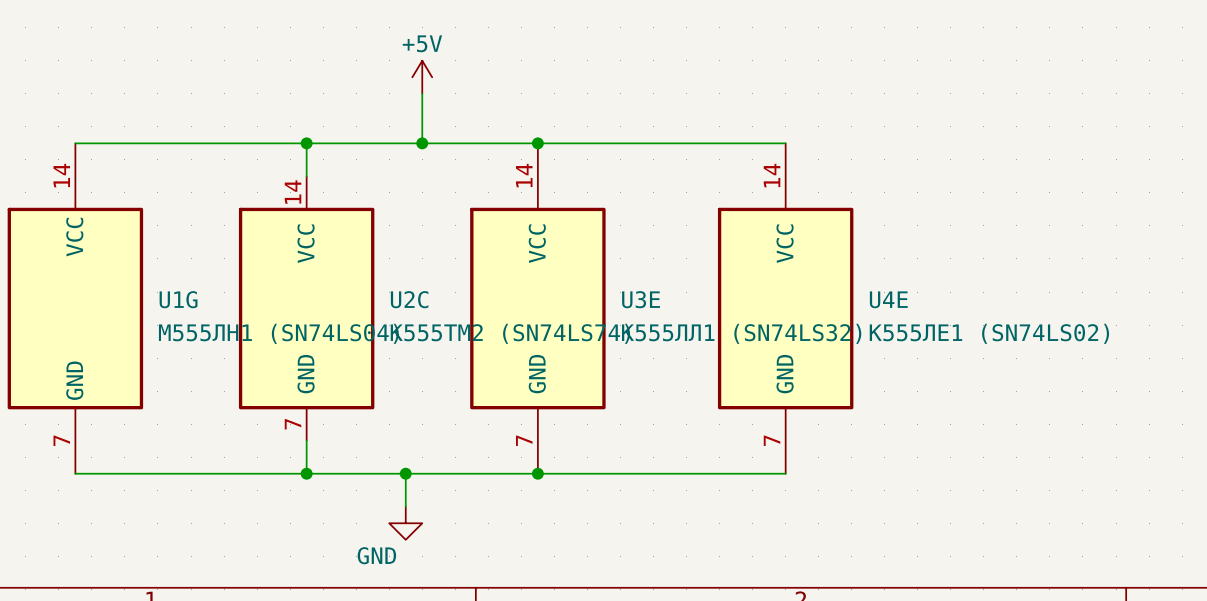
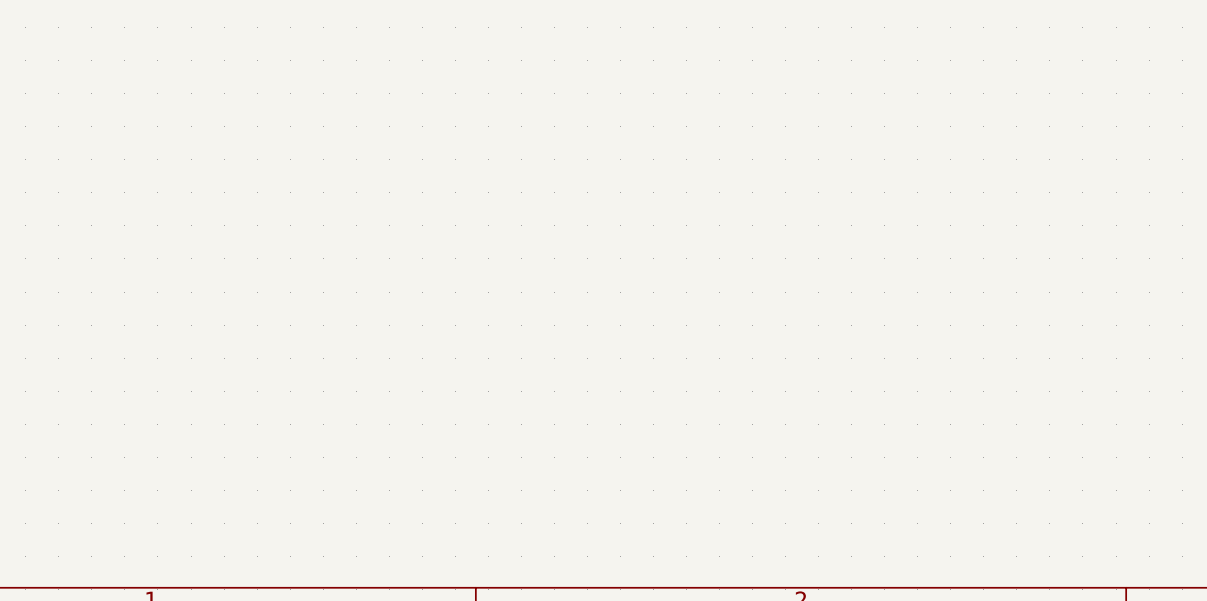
power symbol: +5V (422, 77) -> none
wire: (422, 93) (422, 143) -> none
wire: (75, 143) (785, 143) -> none
wire: (306, 143) (306, 176) -> none
junction: (306, 143) -> none
junction: (422, 143) -> none
junction: (537, 143) -> none
U1G: М555ЛН1 (SN74LS04) (75, 308) -> none
U2C: К555ТМ2 (SN74LS74) (306, 308) -> none
U3E: К555ЛЛ1 (SN74LS32) (537, 308) -> none
U4E: К555ЛЕ1 (SN74LS02) (785, 308) -> none
wire: (306, 440) (306, 473) -> none
wire: (75, 473) (785, 473) -> none
junction: (306, 473) -> none
wire: (405, 473) (405, 506) -> none
junction: (405, 473) -> none
junction: (537, 473) -> none
power symbol: GND (405, 523) -> none

